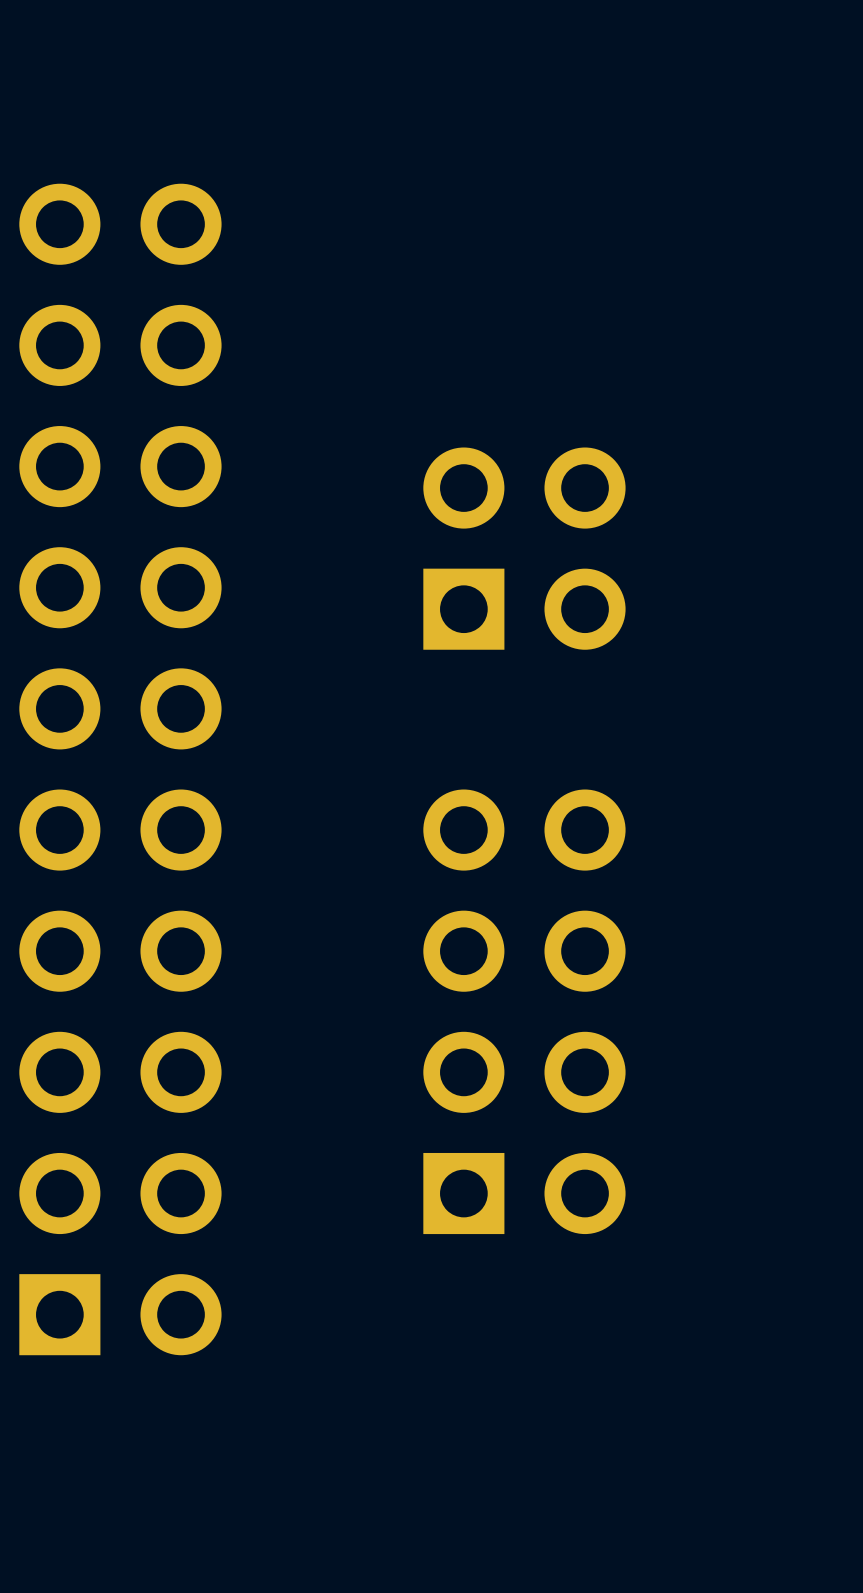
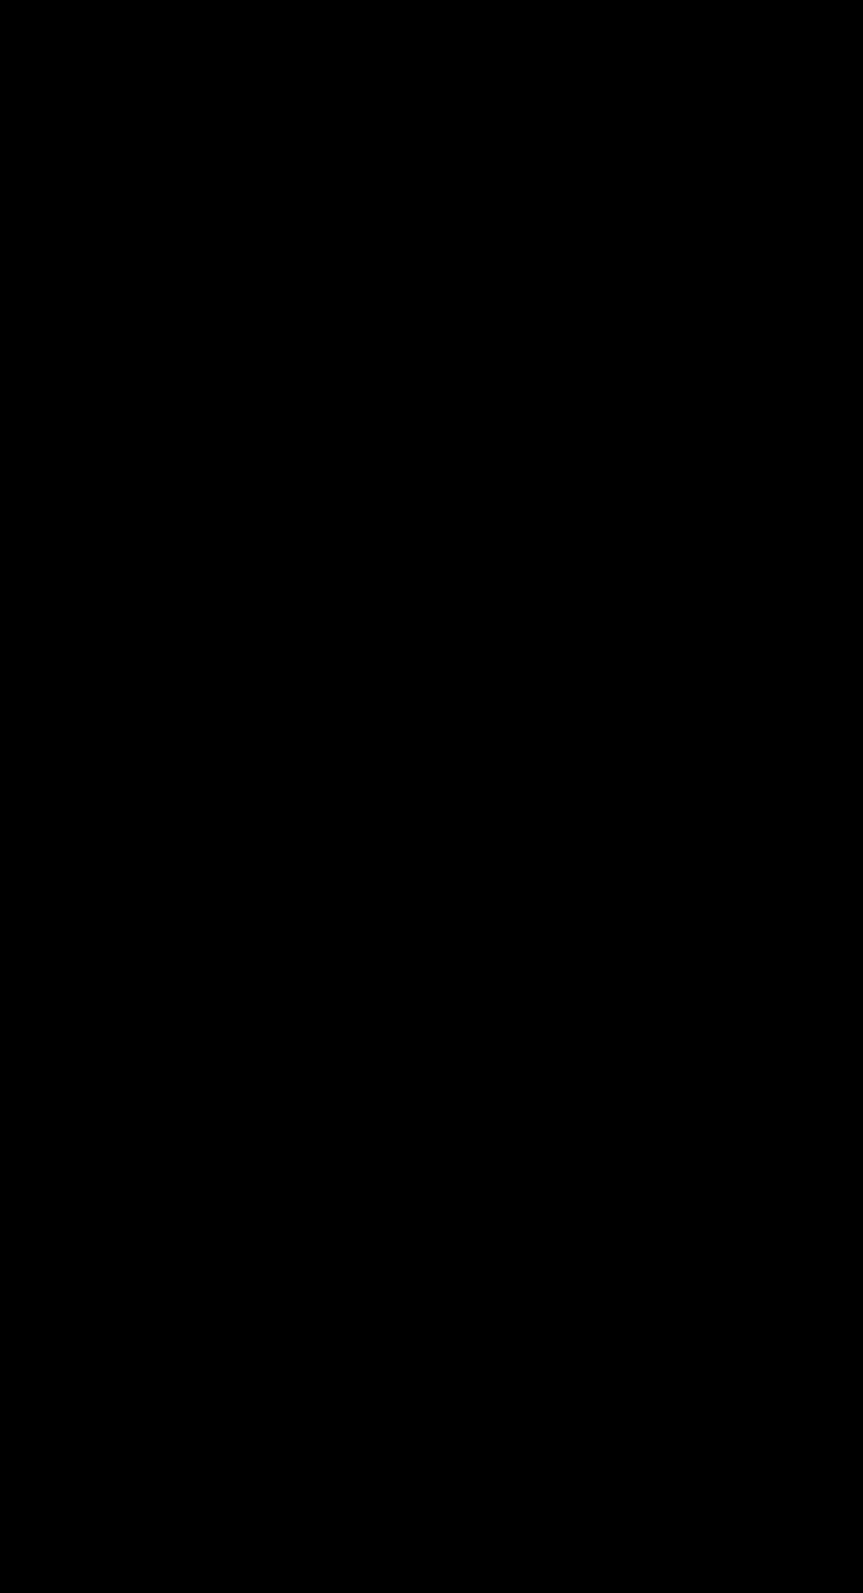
part: (524, 548) -> none
part: (120, 769) -> none
part: (524, 1011) -> none

